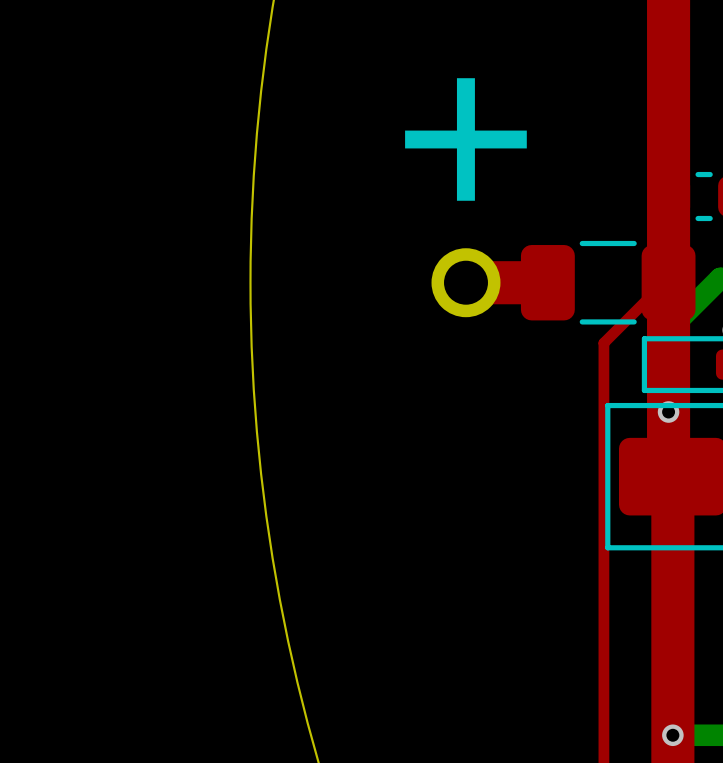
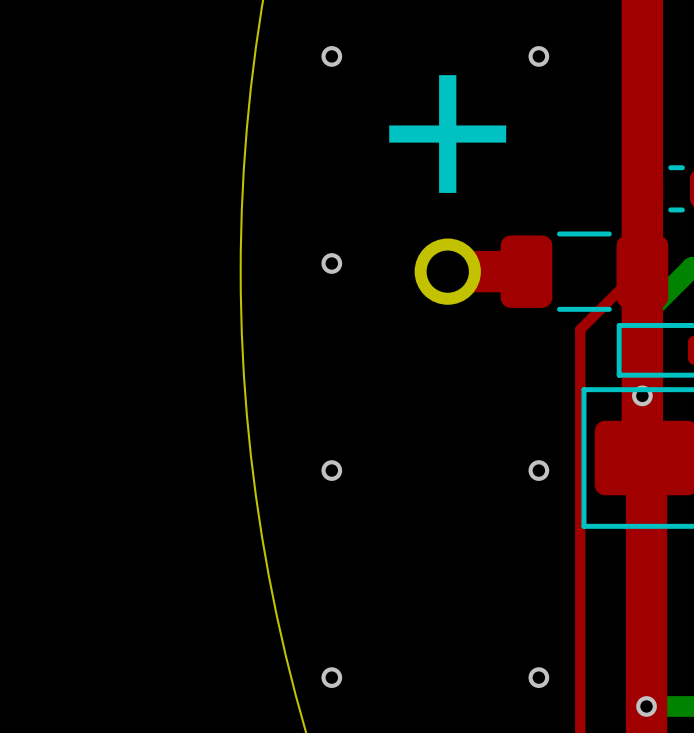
via: none -> (331, 56)
via: none -> (538, 56)
via: none -> (331, 263)
via: none -> (331, 470)
via: none -> (538, 470)
via: none -> (331, 677)
via: none -> (538, 677)

